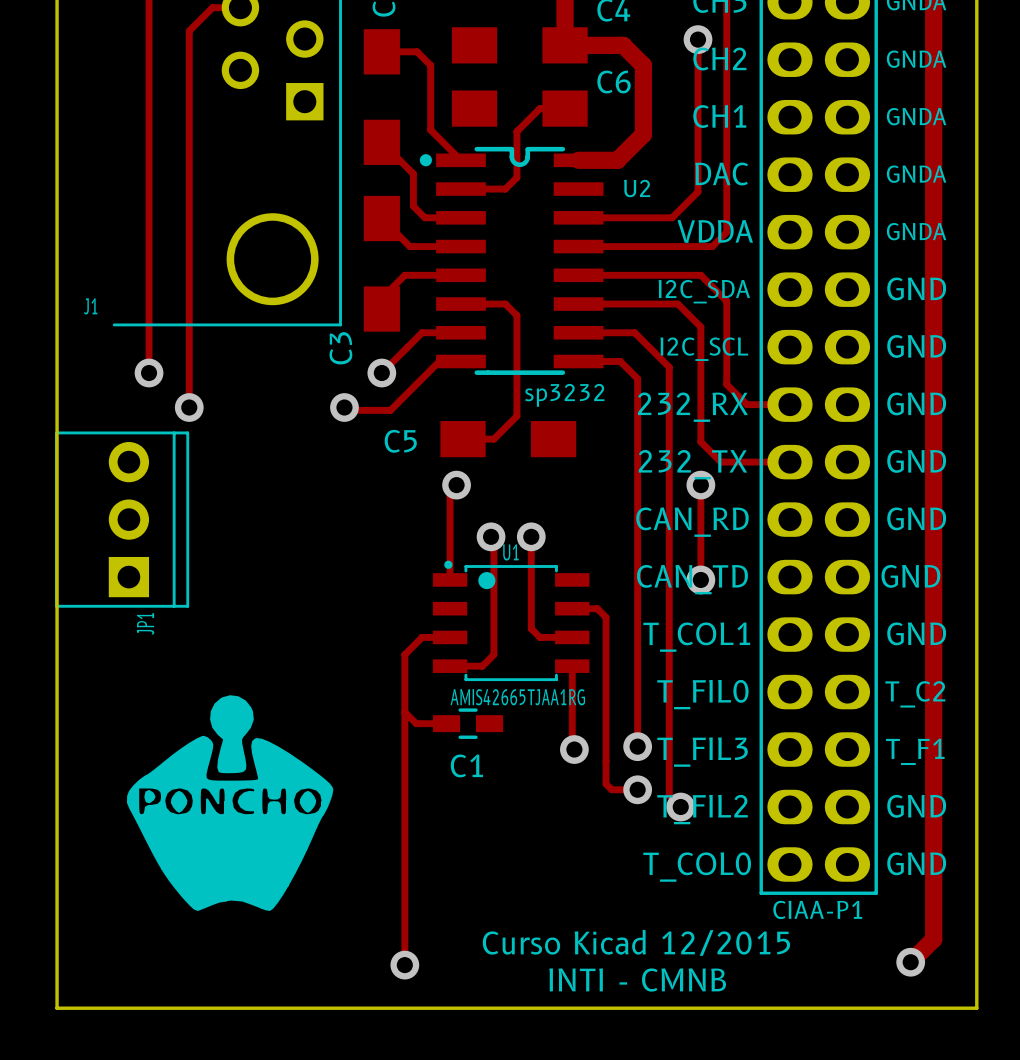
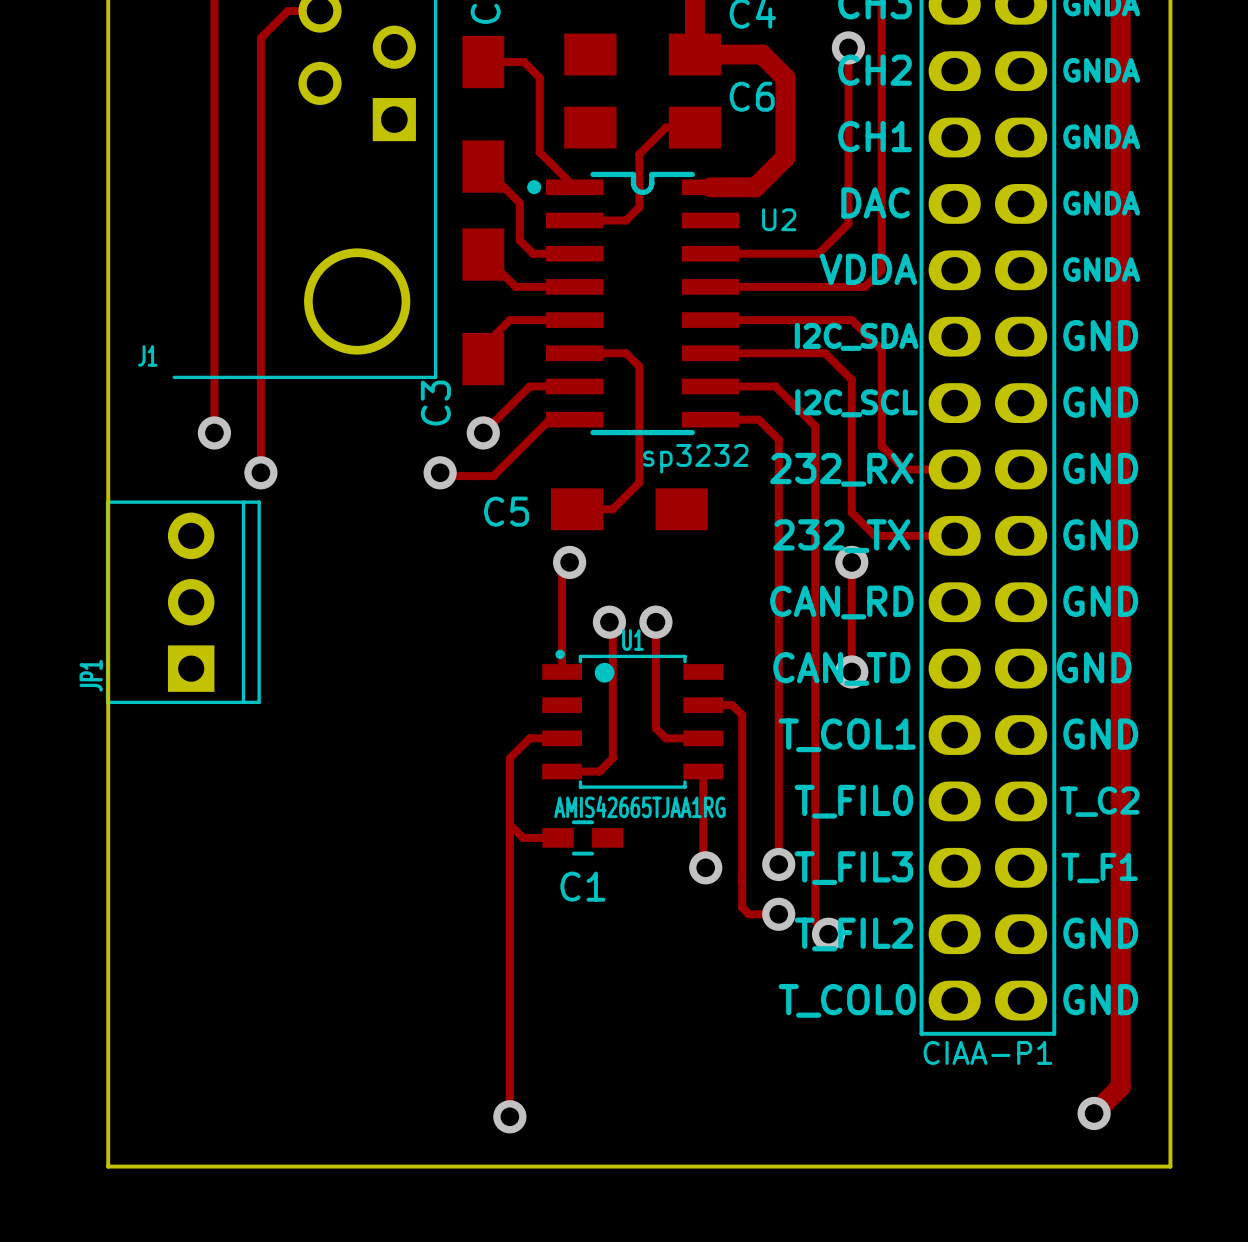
JP1 name position: JP1 (145, 623) -> JP1 (91, 675)
drawing: [126, 695, 334, 911] -> none
text: Curso Kicad 12/2015 (636, 942) -> none
text: INTI - CMNB (637, 980) -> none

